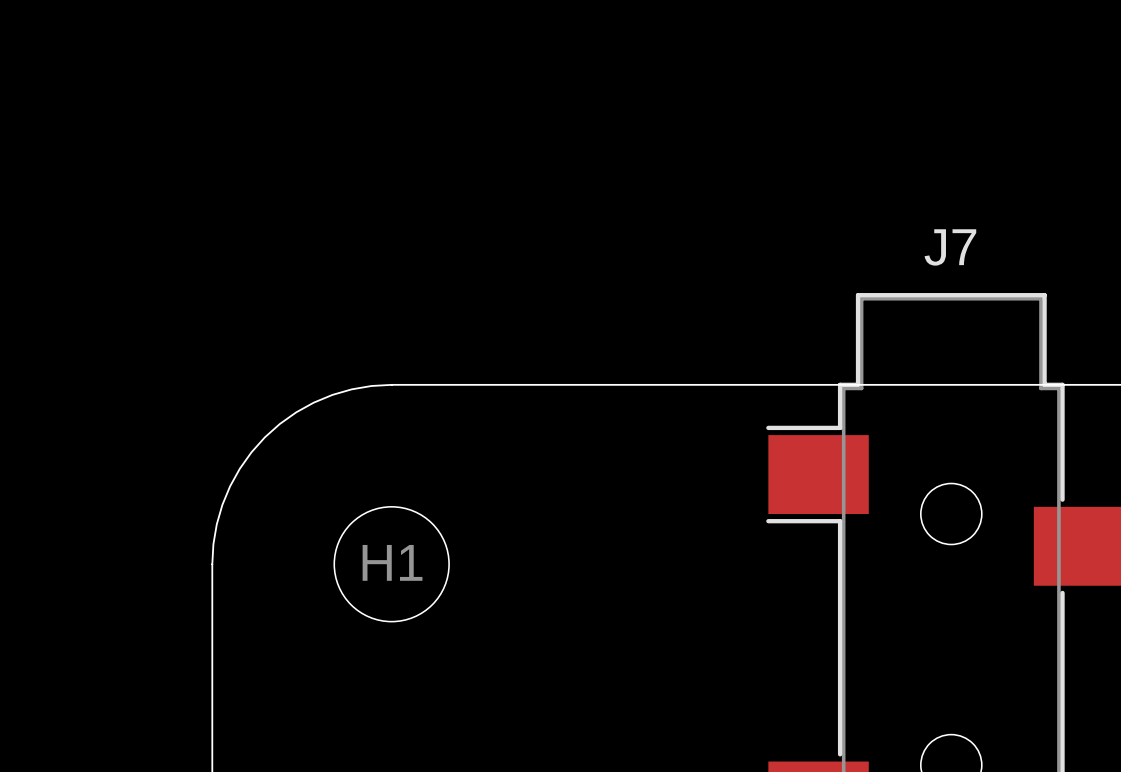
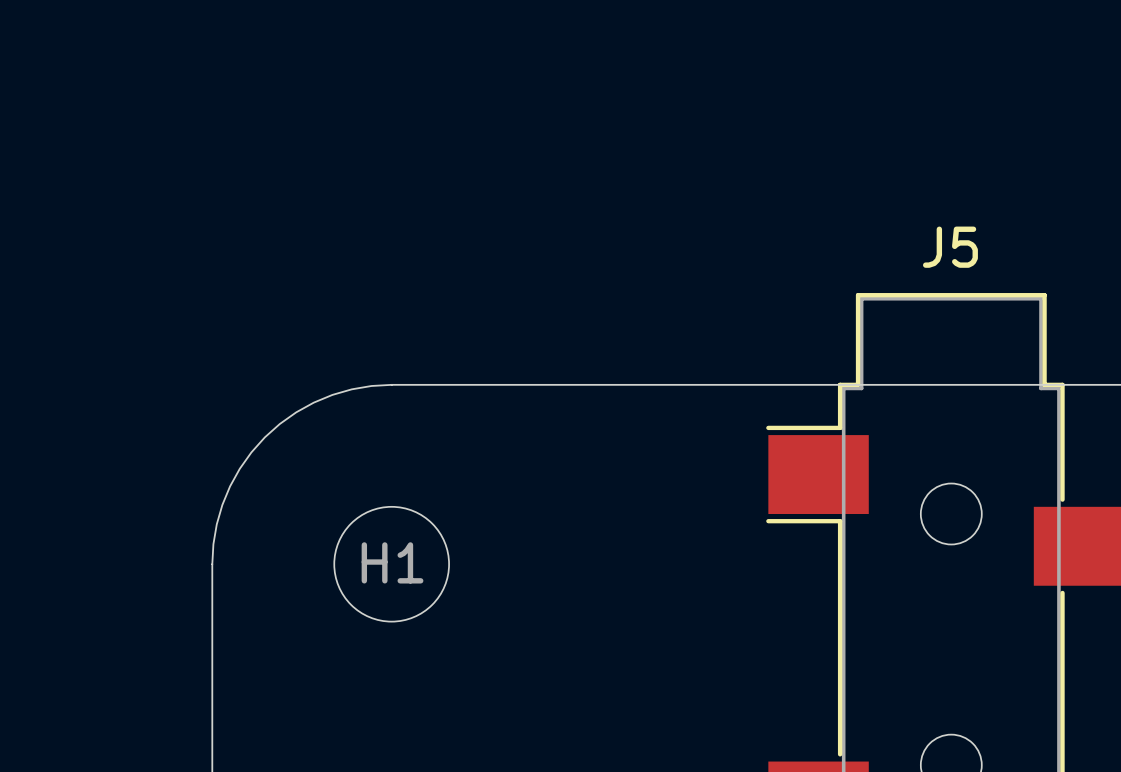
J7 name: J7 (950, 247) -> J5 (950, 247)

